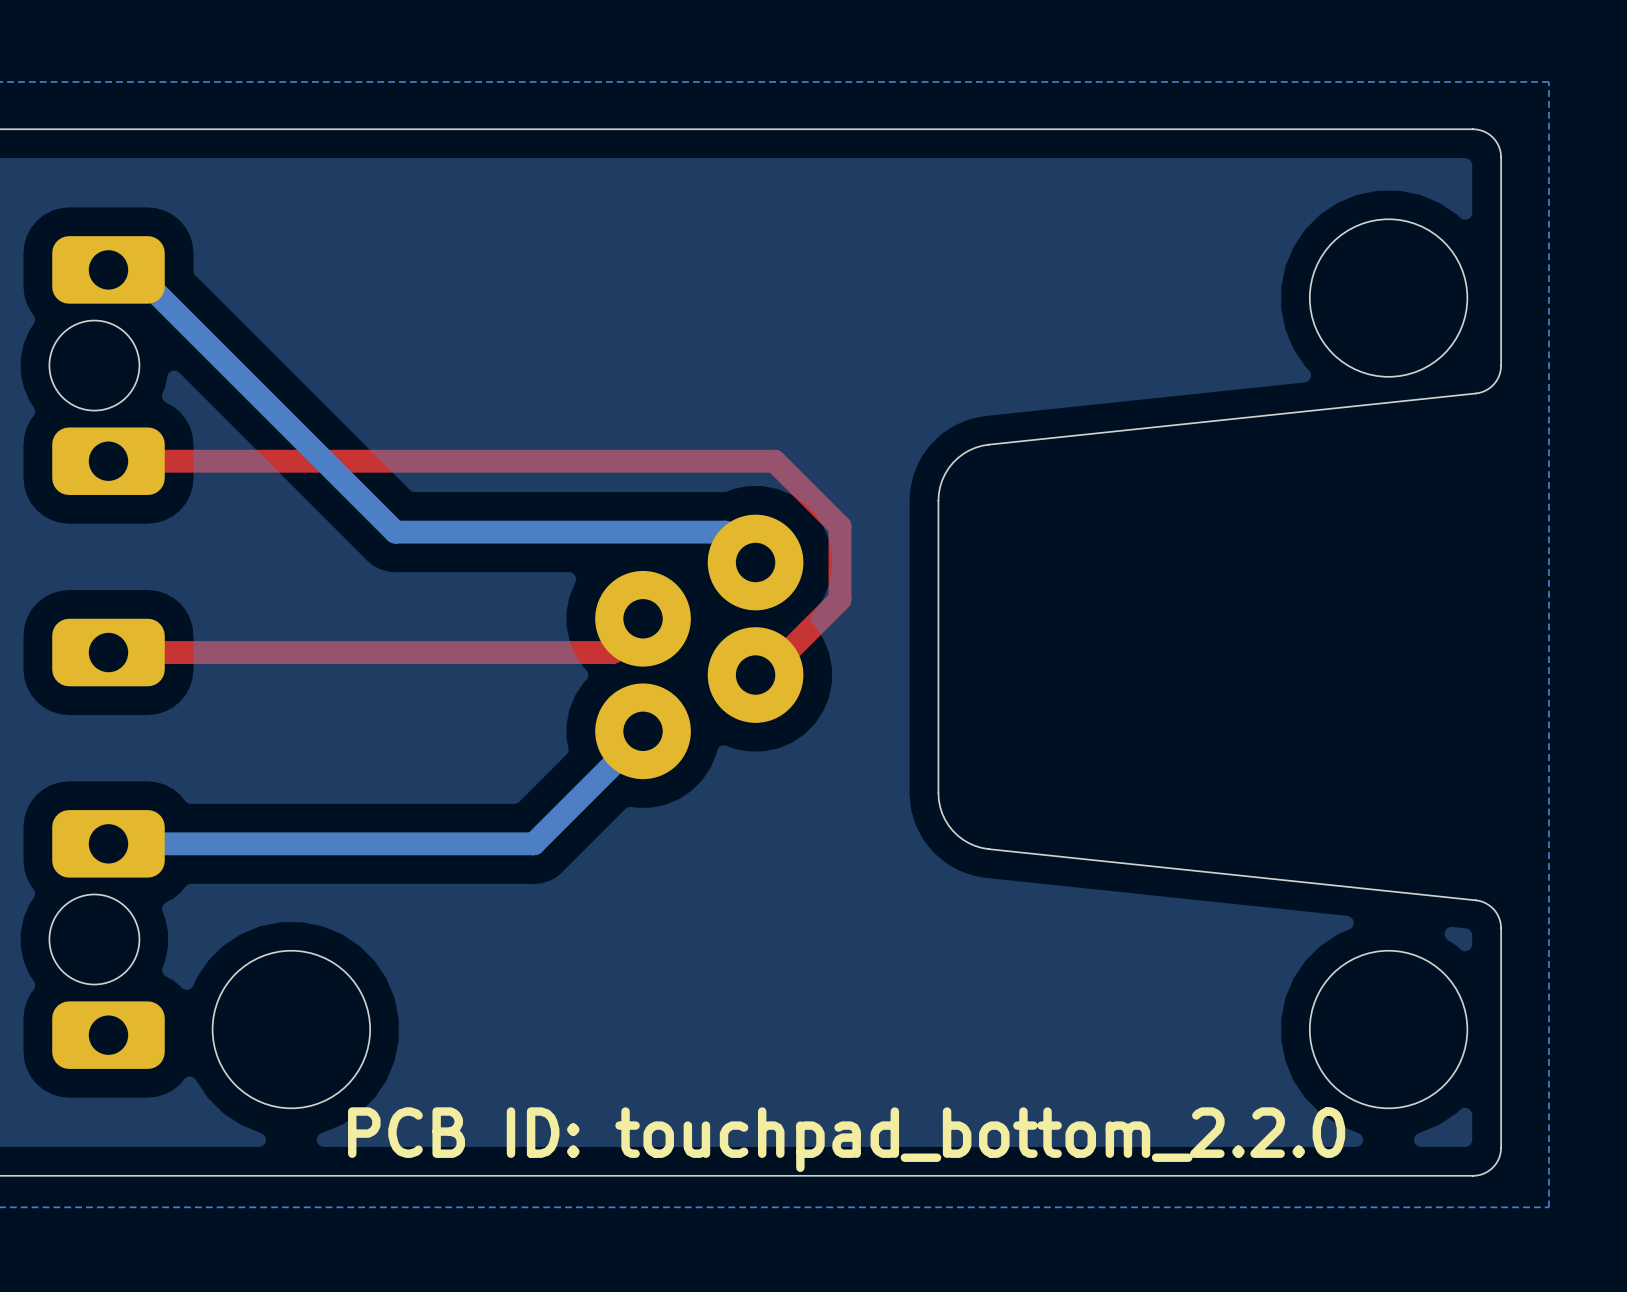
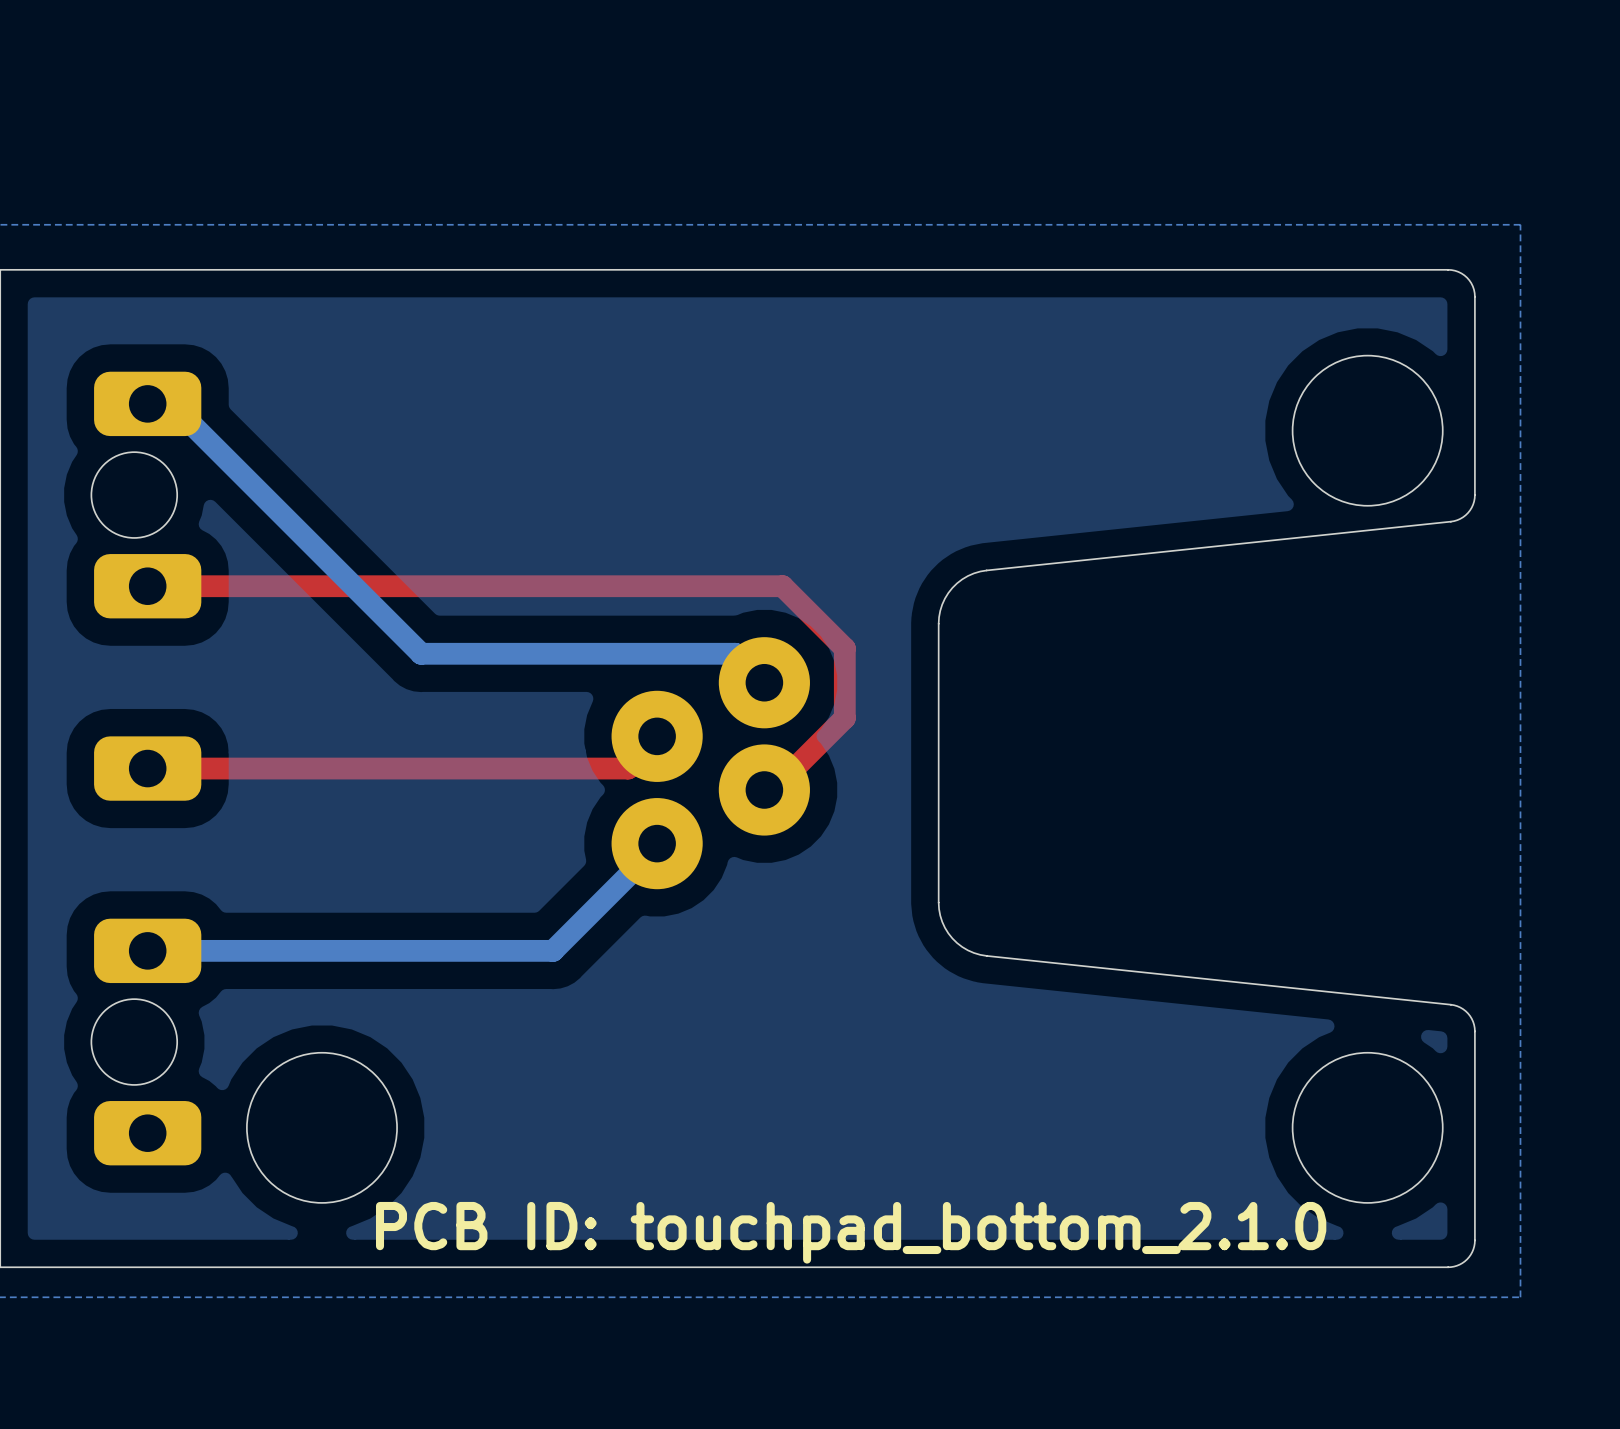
text: PCB ID: touchpad_bottom_2.2.0 (846, 1139) -> PCB ID: touchpad_bottom_2.1.0 (851, 1232)

